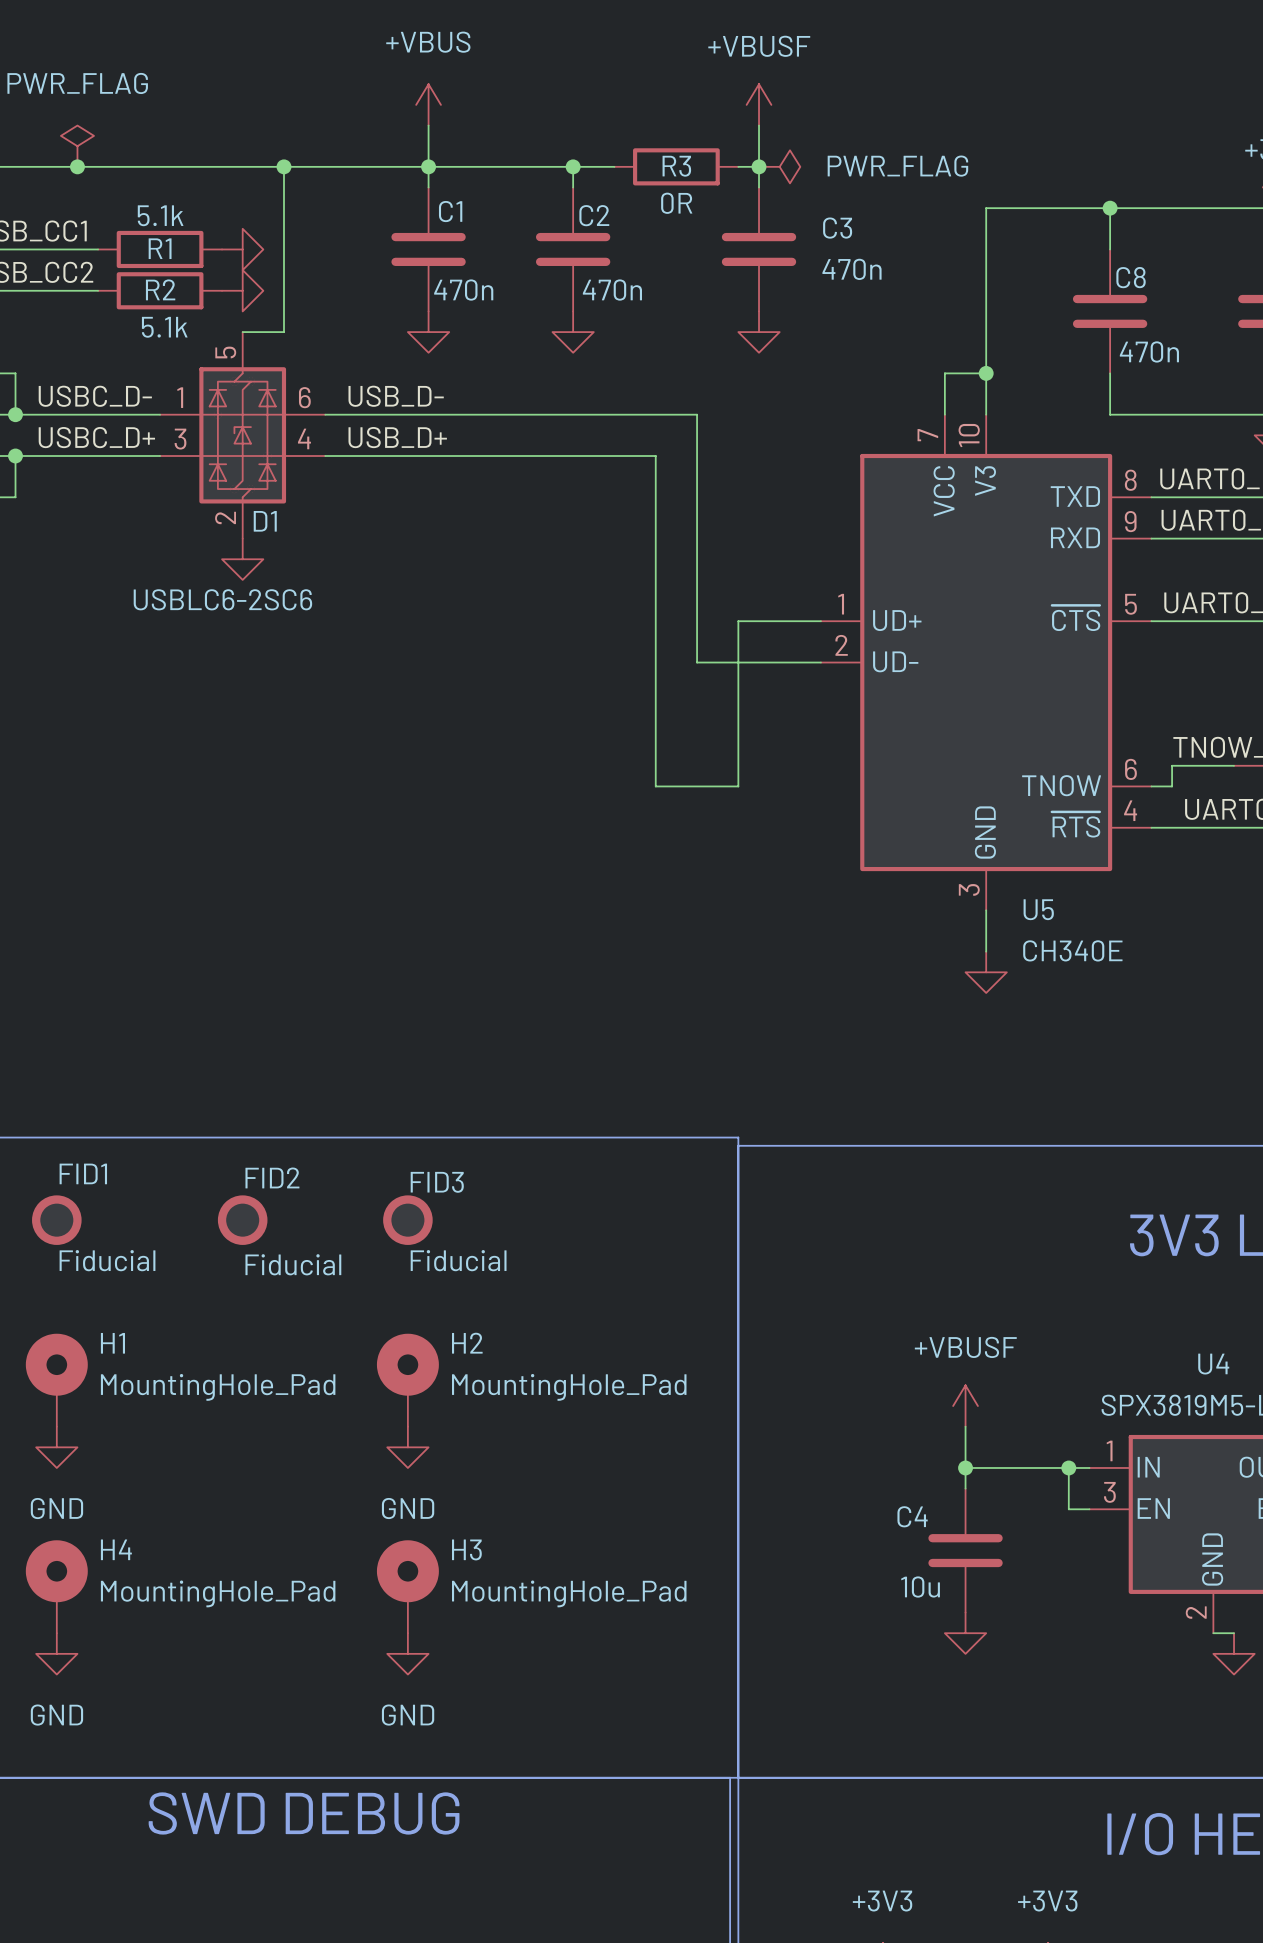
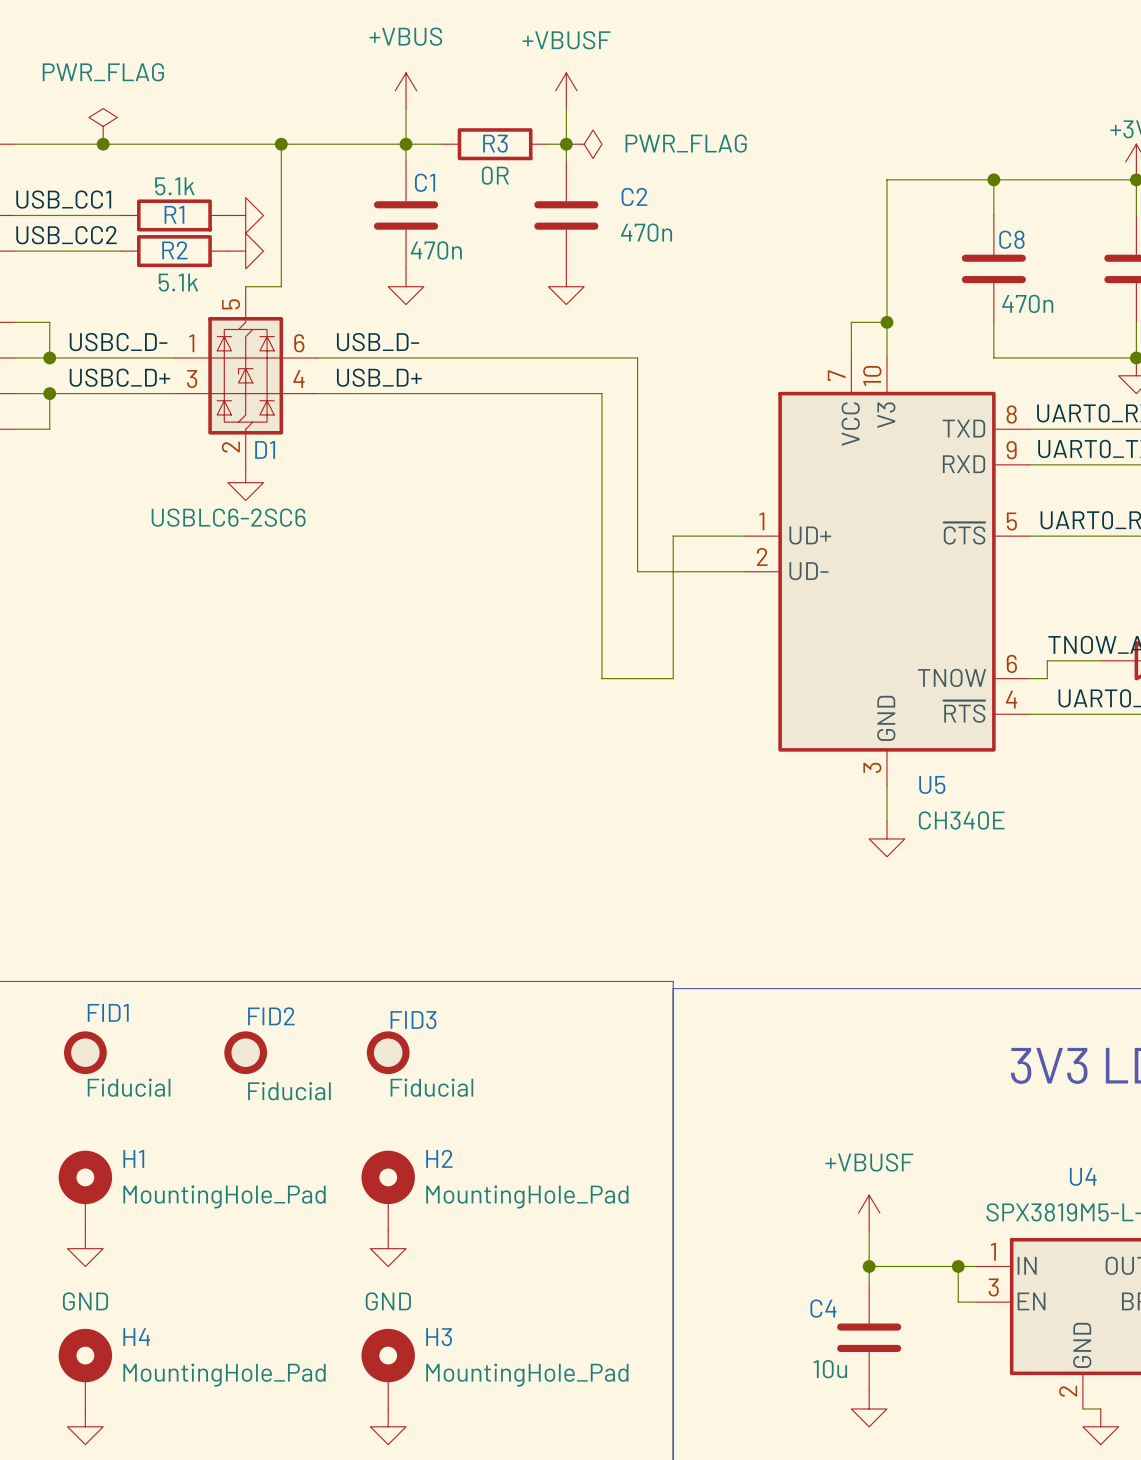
power symbol position: +VBUSF (759, 104) -> +VBUSF (566, 90)
wire: (759, 125) (759, 187) -> (566, 108) (566, 162)
wire: (469, 166) (593, 166) -> none
junction position: (573, 166) -> (566, 144)
R3 position: (676, 166) -> (495, 144)
wire: (738, 166) (759, 166) -> none
junction: (759, 166) -> none
power symbol position: PWR_FLAG (779, 166) -> PWR_FLAG (584, 144)
C2 name position: C2 (594, 215) -> C2 (634, 197)
C2 position: (573, 249) -> (566, 215)
C3: 470n (759, 249) -> none
C2 value position: 470n (612, 290) -> 470n (646, 232)
power symbol position: (573, 332) -> (566, 286)
power symbol: (759, 332) -> none

